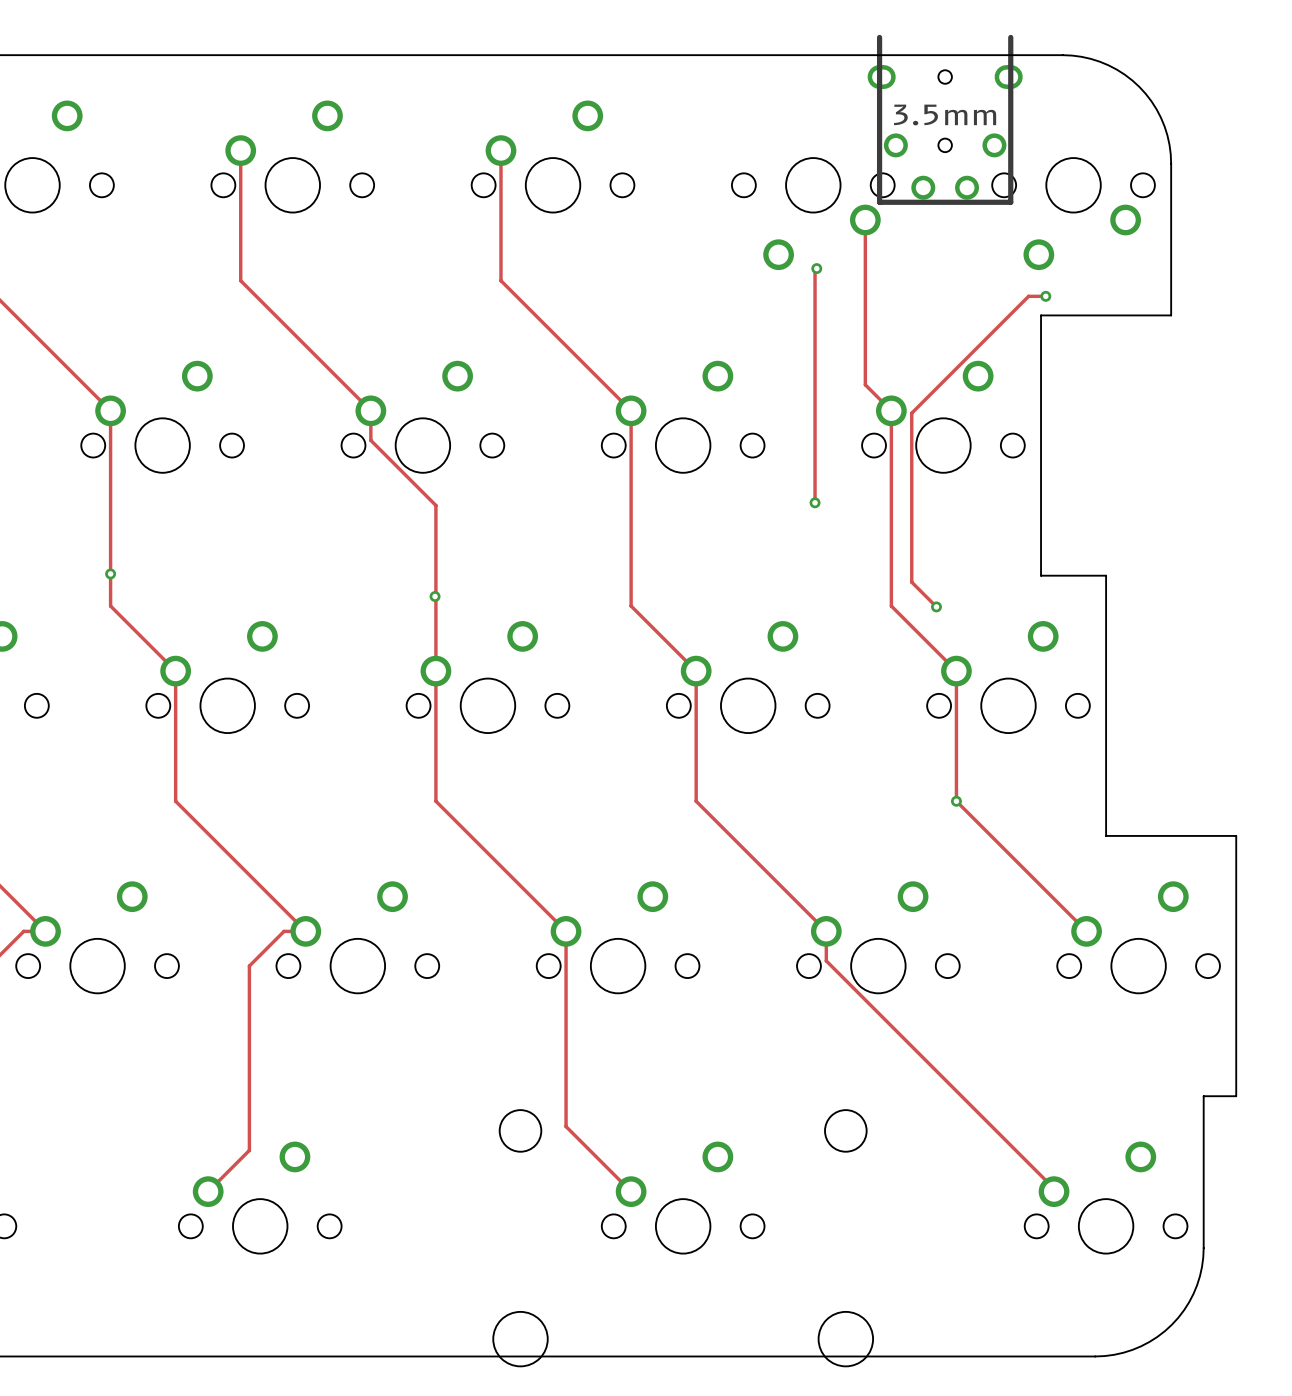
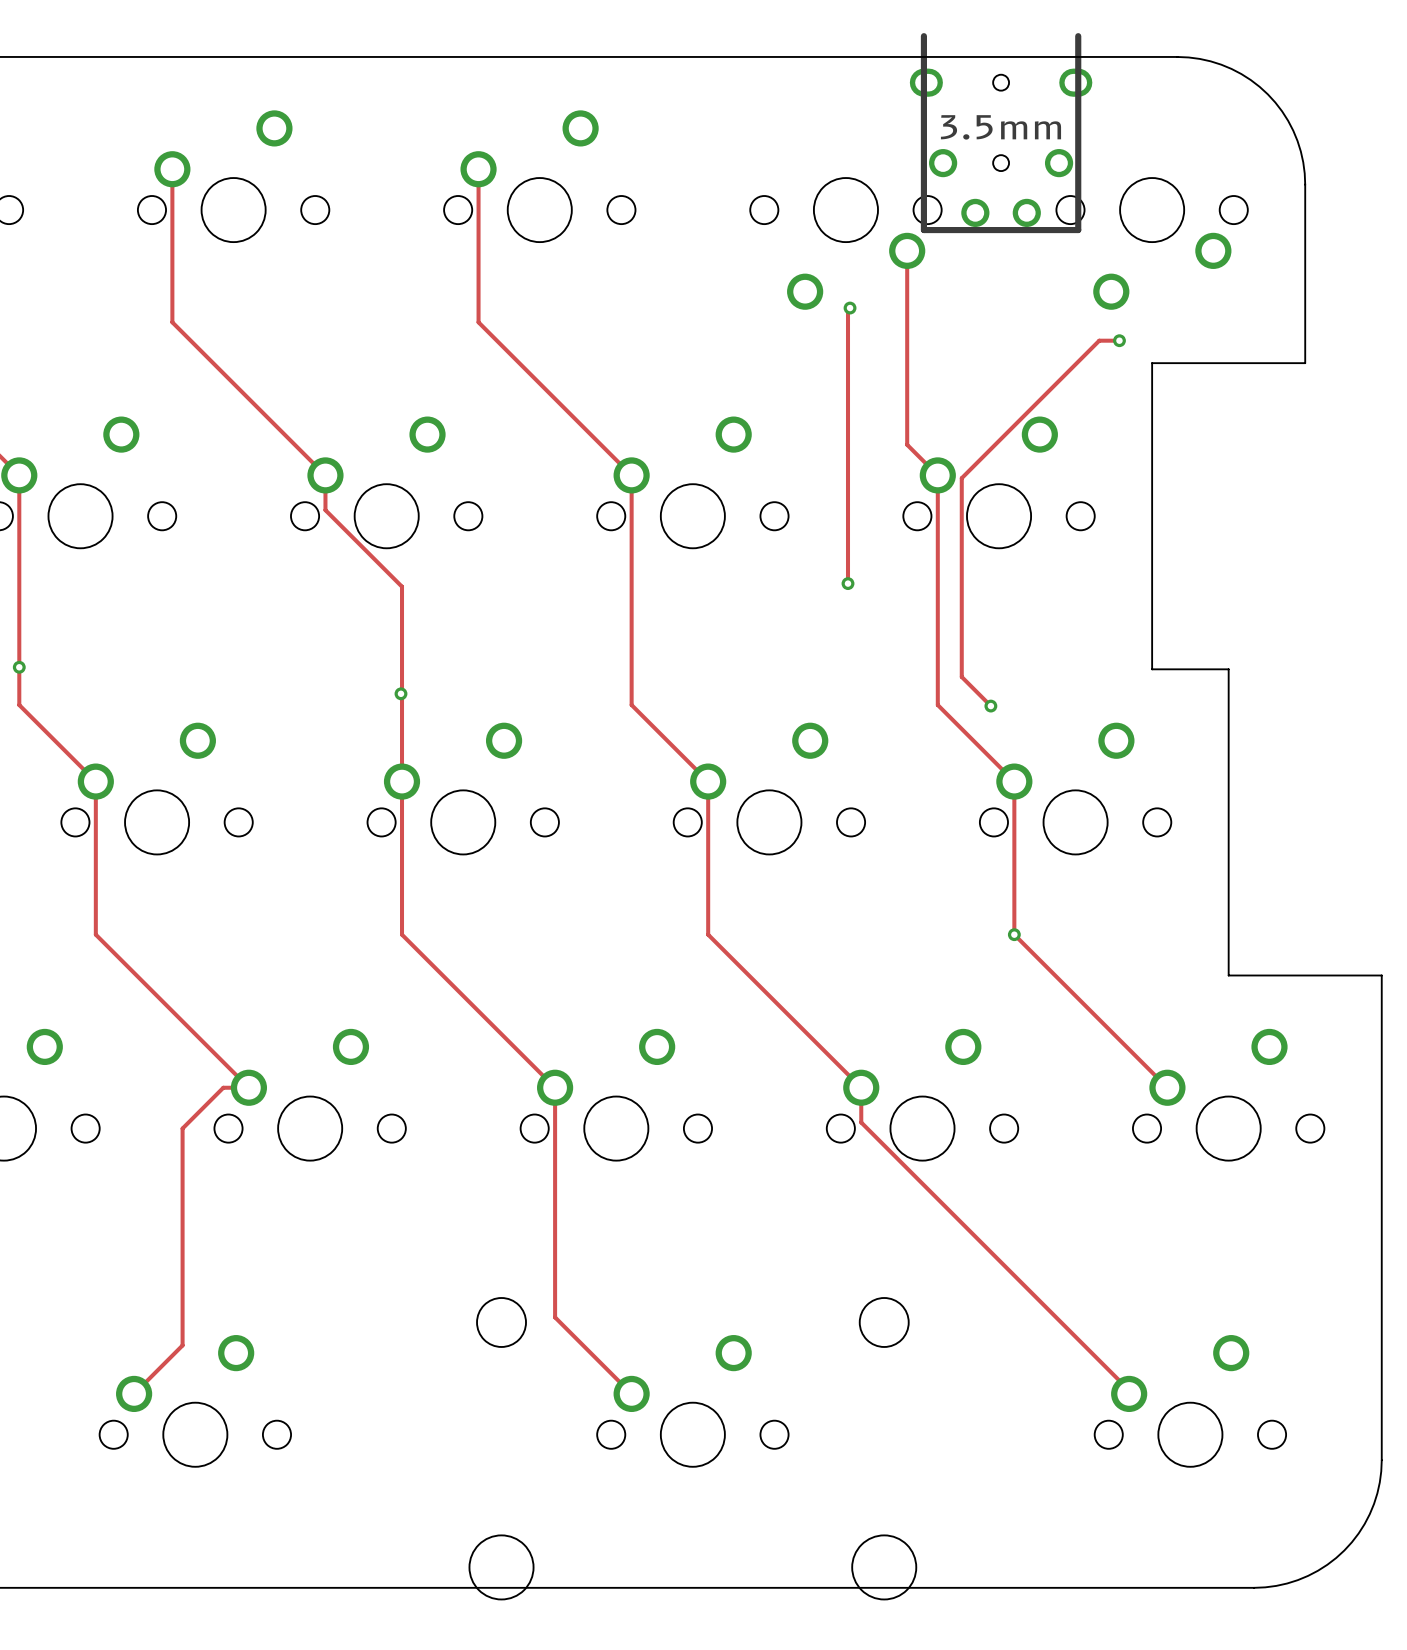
board edge: (1062, 55) (1081, 56) (1099, 61) (1124, 74) (1145, 93) (1161, 117) (1167, 135) (1170, 154) (1171, 315) -> (1139, 56) (1188, 57) (1210, 61) (1231, 68) (1250, 80) (1267, 94) (1282, 111) (1293, 130) (1300, 151) (1304, 173) (1305, 363) (1266, 363)
board edge: (1073, 315) (1041, 315) (1041, 575) (1073, 575) -> (1152, 363) (1152, 669)
board edge: (1106, 575) (1106, 835) (1138, 835) -> (1190, 669) (1228, 669) (1228, 975)
board edge: (1236, 835) (1236, 1096) (1203, 1096) (1203, 1248) (1199, 1276) (1193, 1293) (1184, 1310) (1171, 1324) (1157, 1336) (1141, 1346) (1123, 1352) (1095, 1356) -> (1343, 975) (1381, 975) (1381, 1460) (1377, 1493) (1369, 1514) (1351, 1542) (1327, 1564) (1308, 1575) (1287, 1583) (1265, 1587) (1177, 1587)

